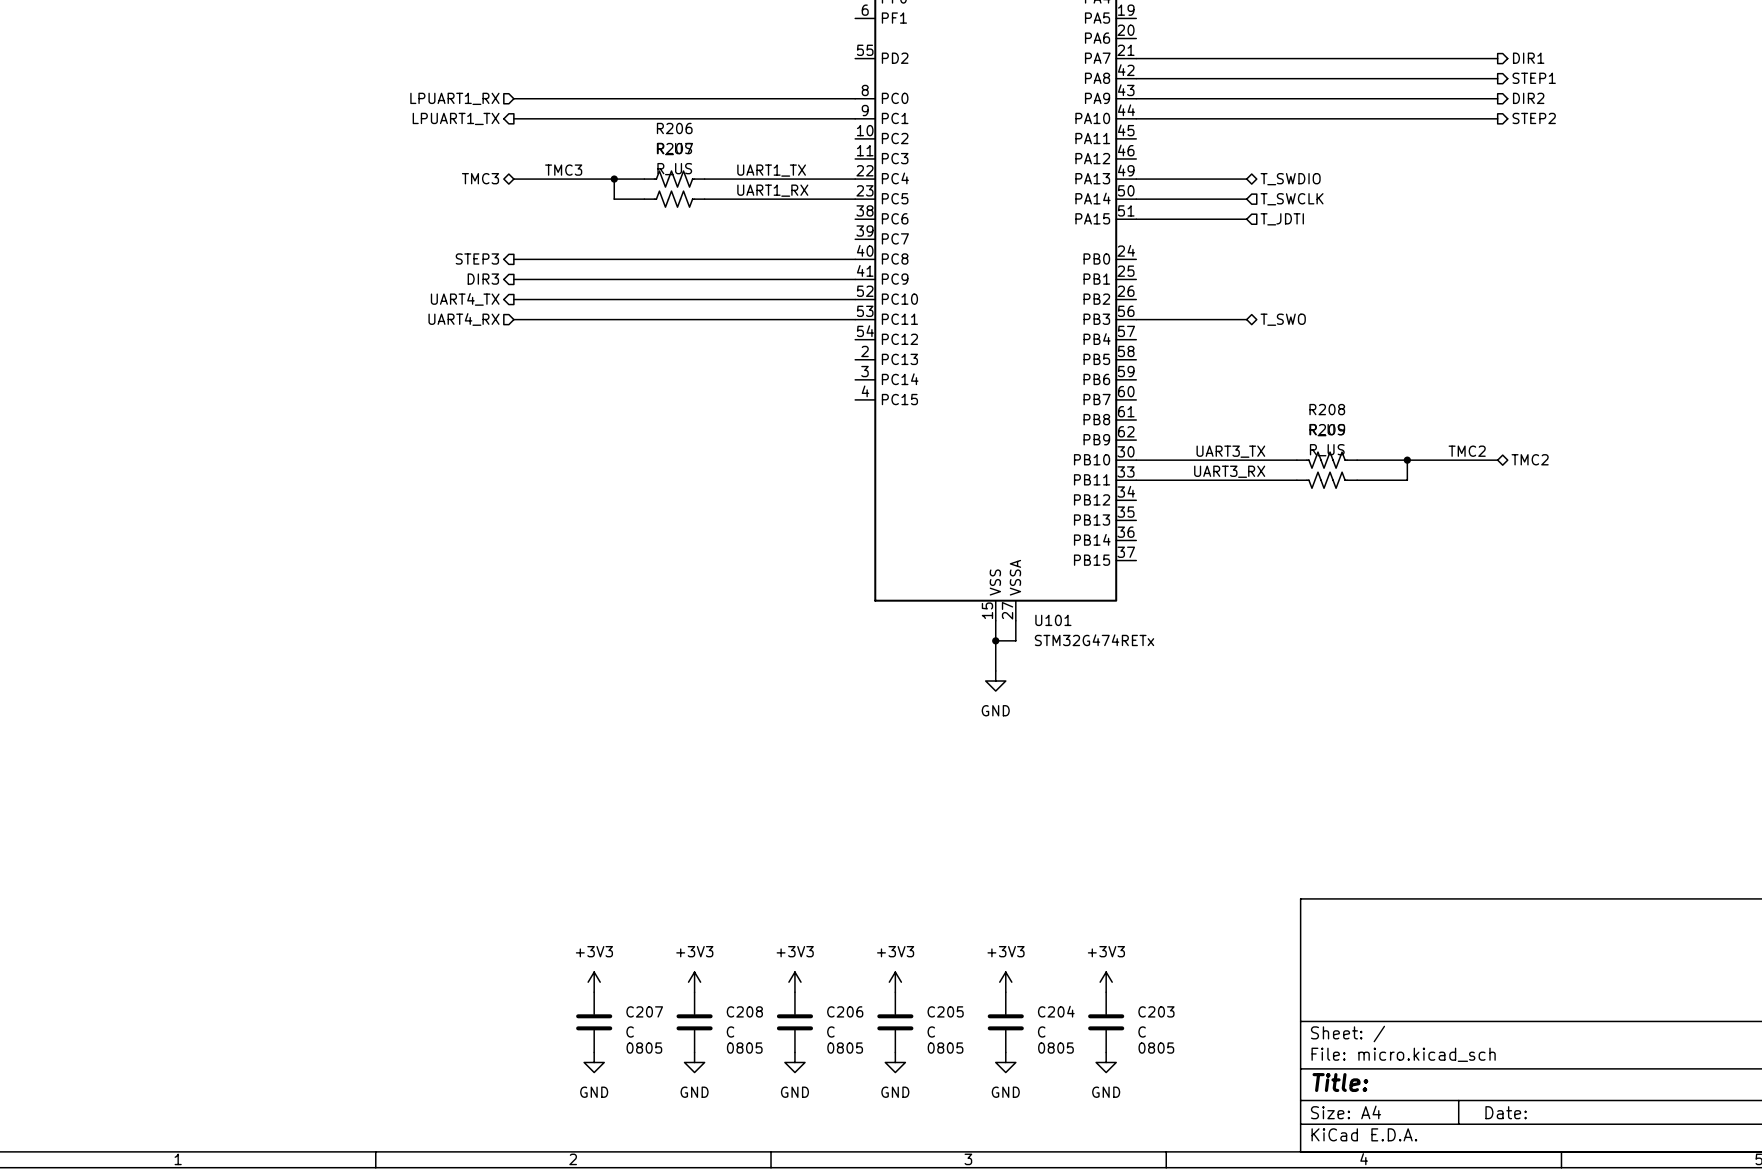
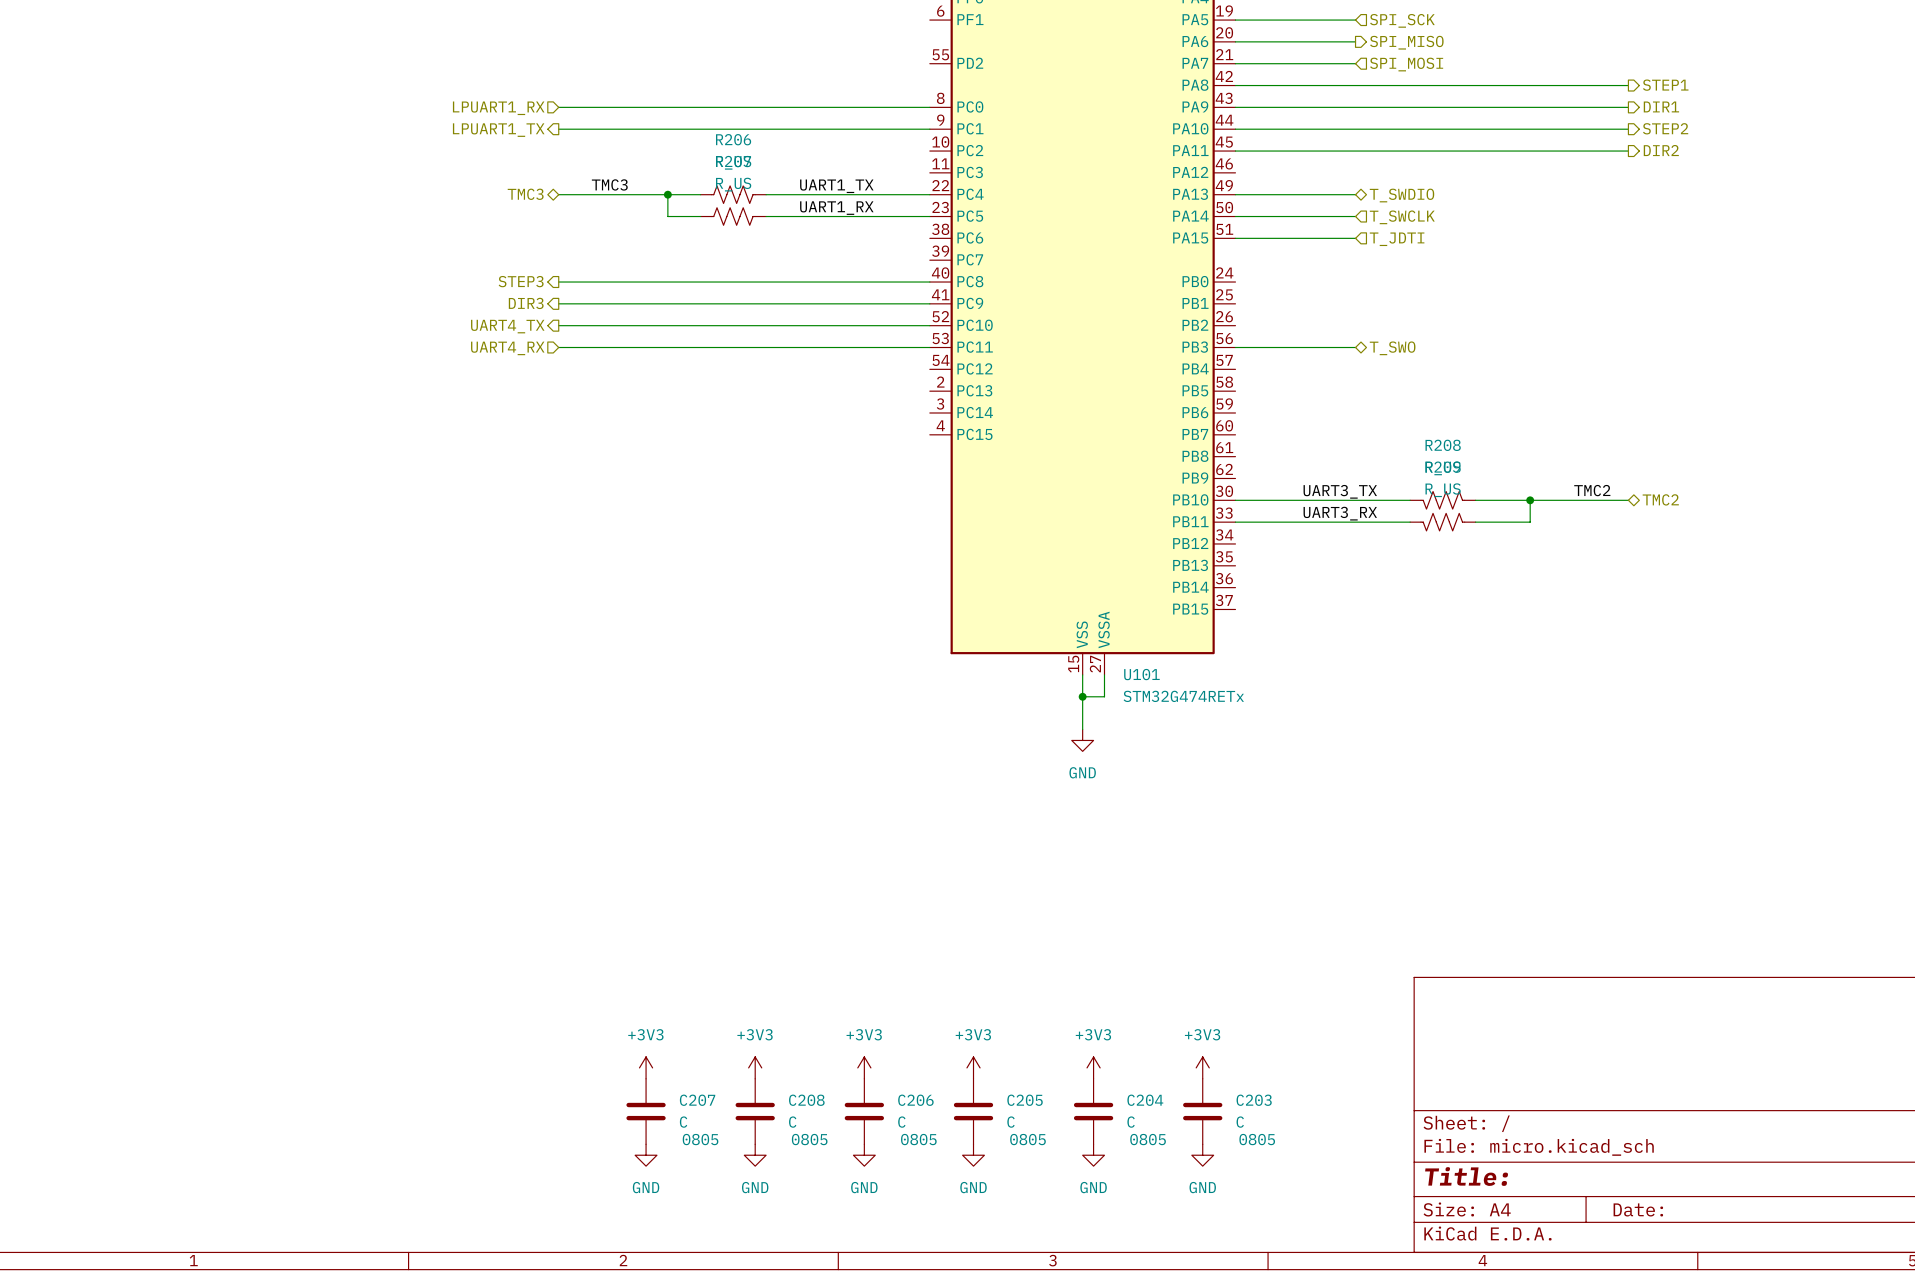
wire: none -> (1235, 20) (1355, 20)
hierarchical label: none -> SPI_SCK (1402, 20)
wire: none -> (1235, 41) (1355, 41)
hierarchical label: none -> SPI_MISO (1406, 42)
wire: (1246, 58) (1497, 58) -> none
hierarchical label: none -> SPI_MOSI (1406, 64)
hierarchical label: DIR1 (1528, 58) -> none
hierarchical label: DIR2 (1528, 98) -> DIR1 (1661, 106)
wire: none -> (1235, 151) (1628, 151)
hierarchical label: none -> DIR2 (1661, 150)

